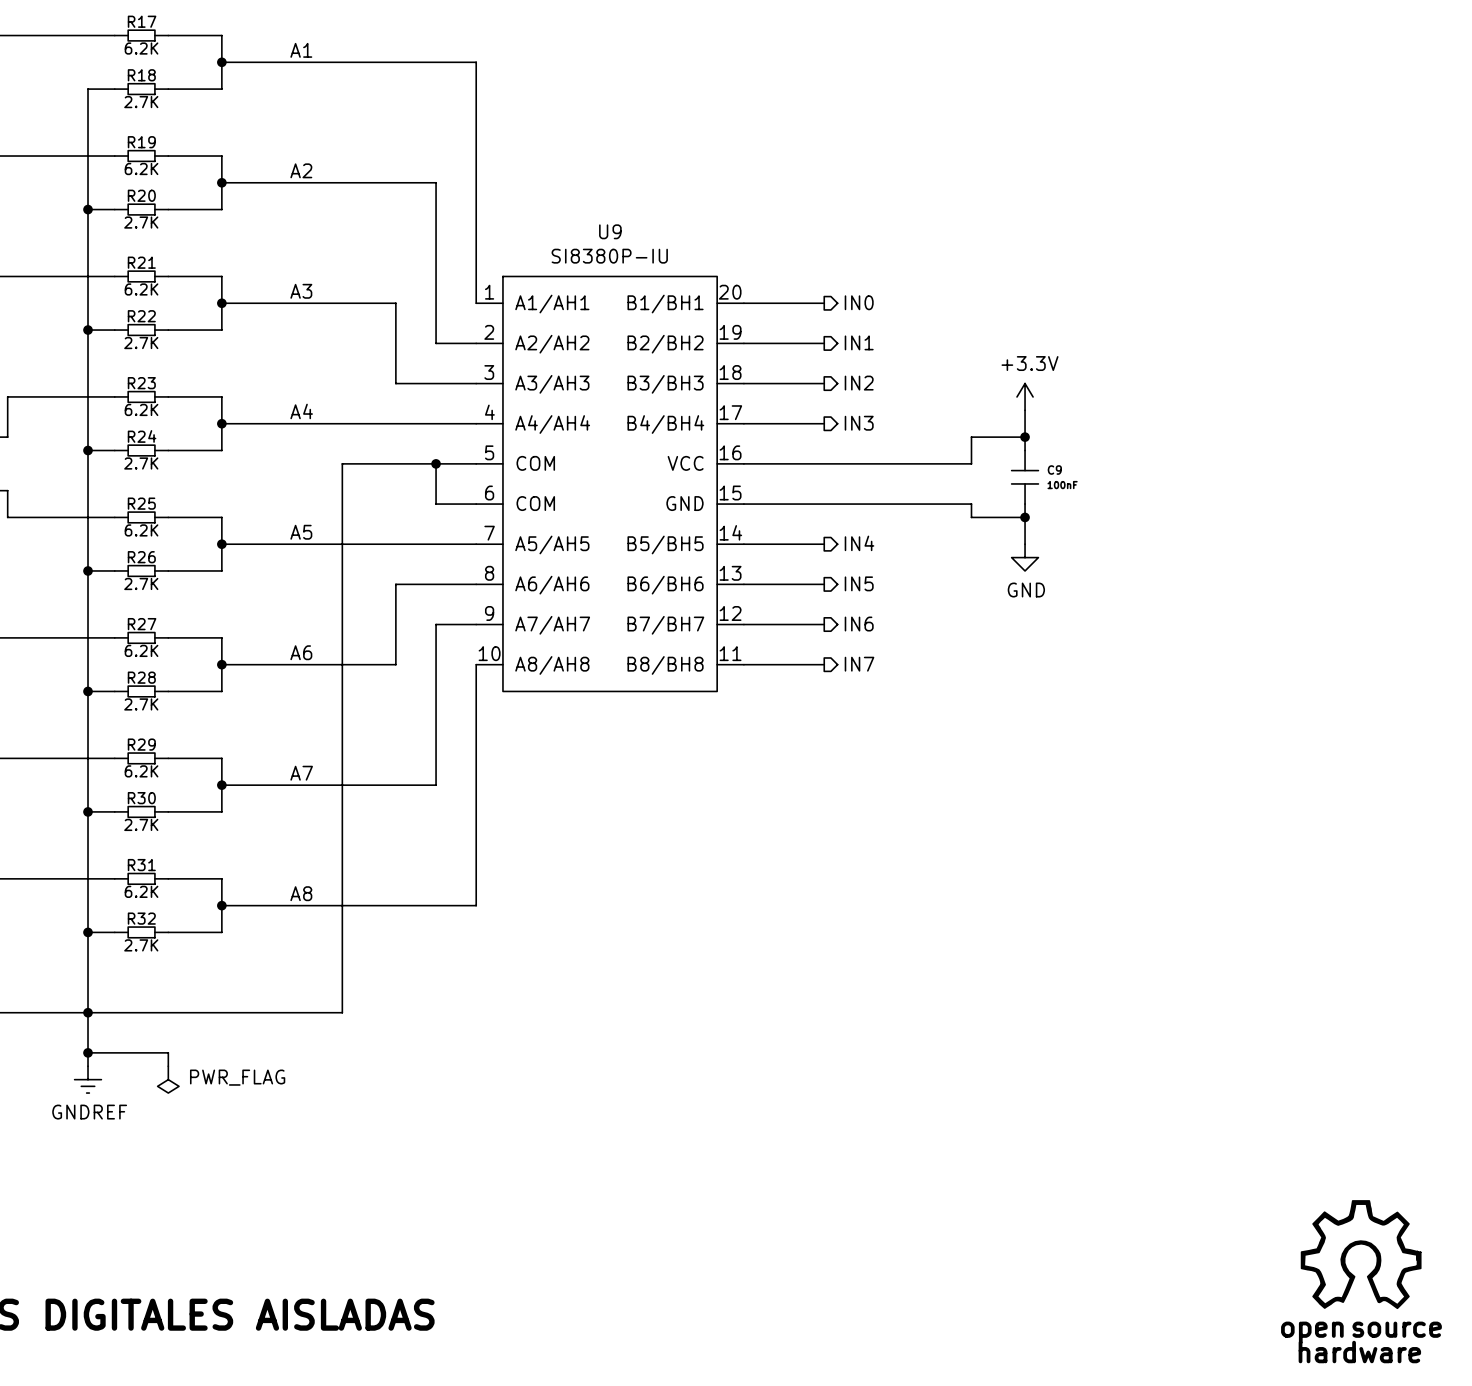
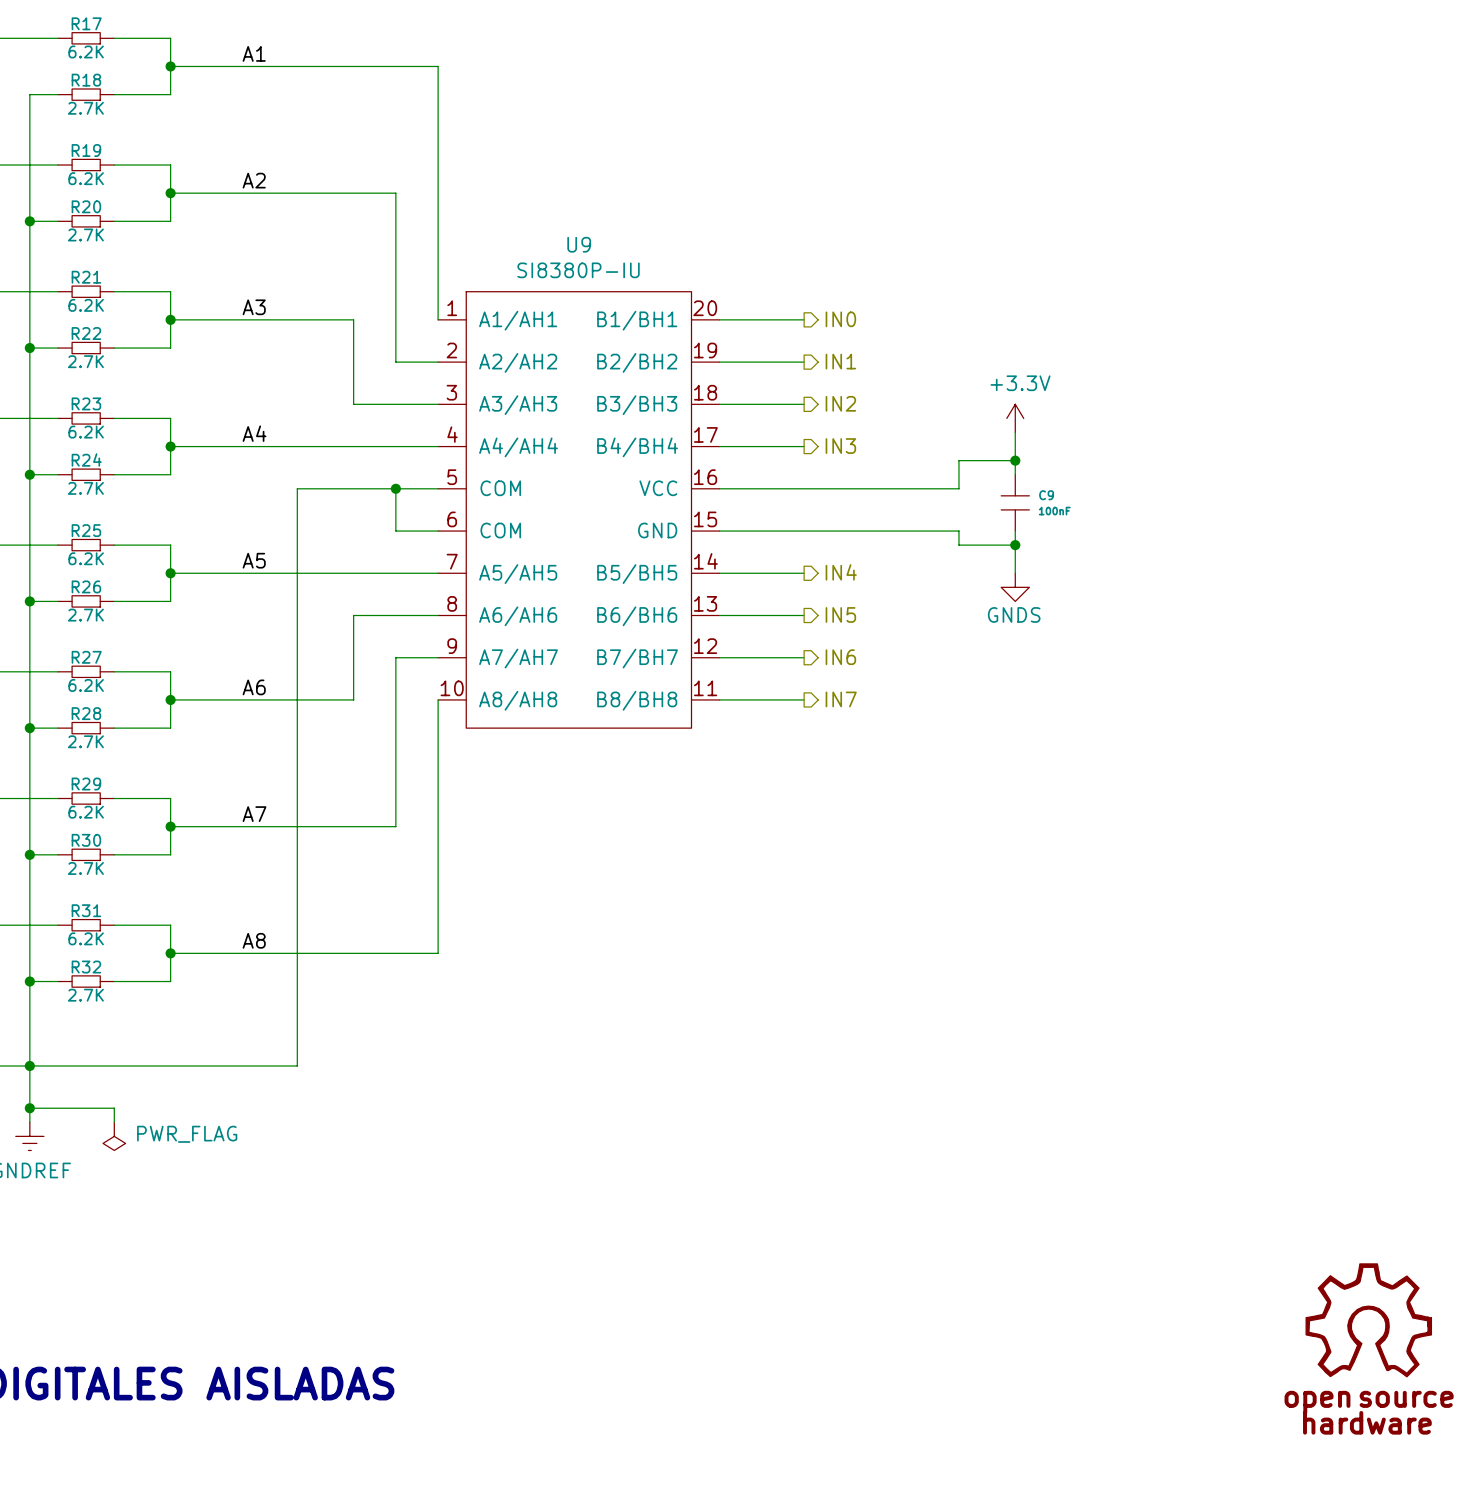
power symbol: GND (1025, 557) -> GNDS (1015, 587)

